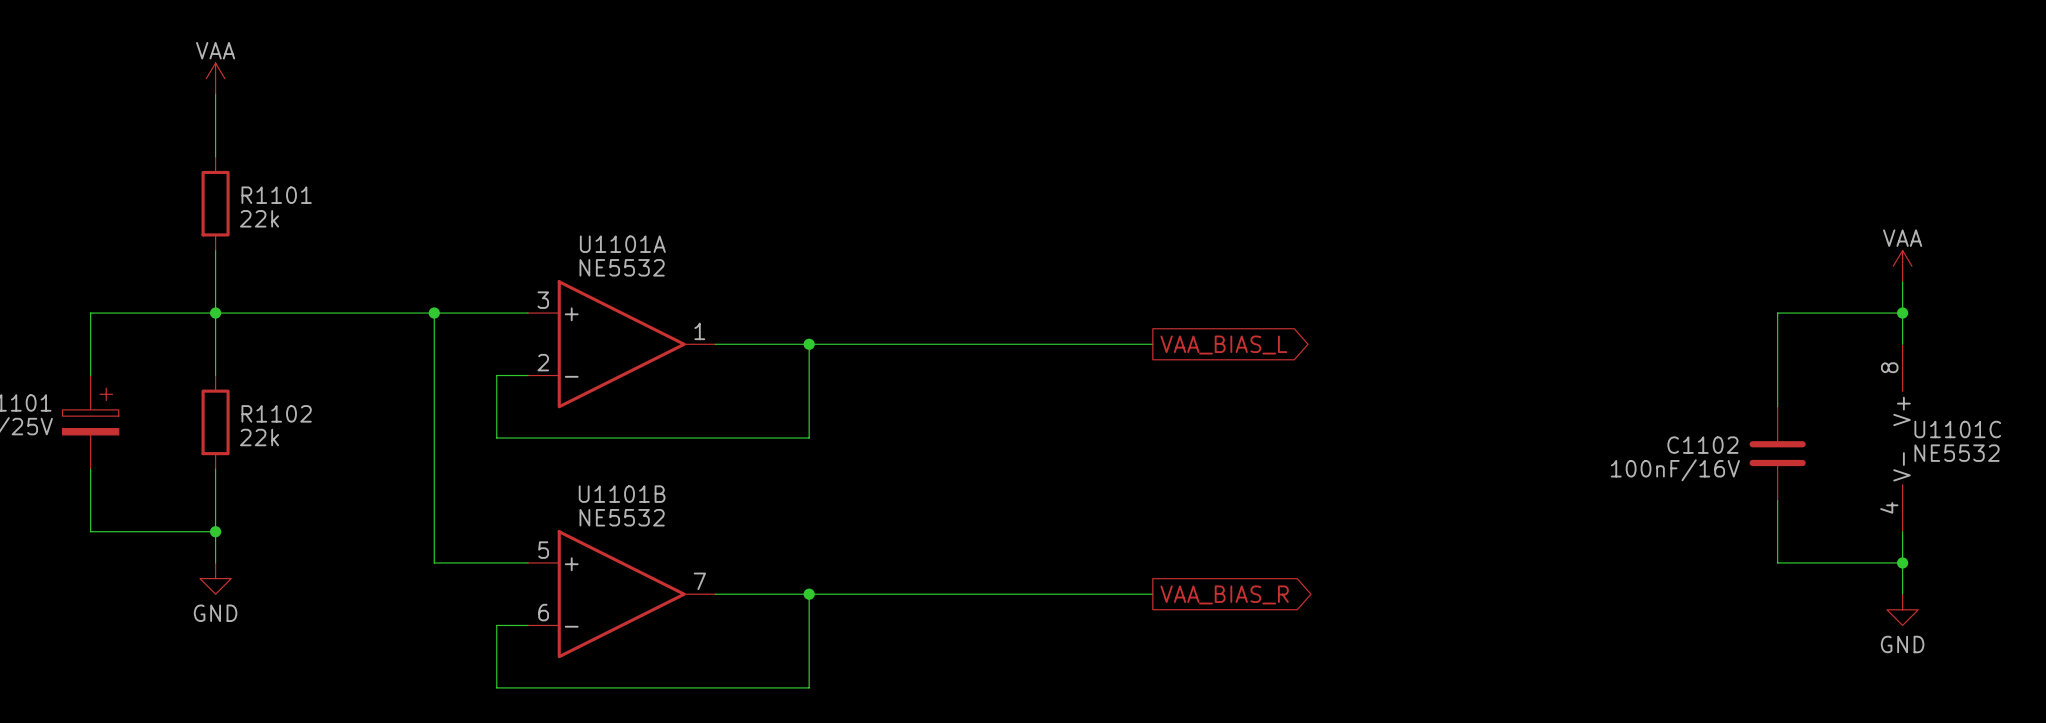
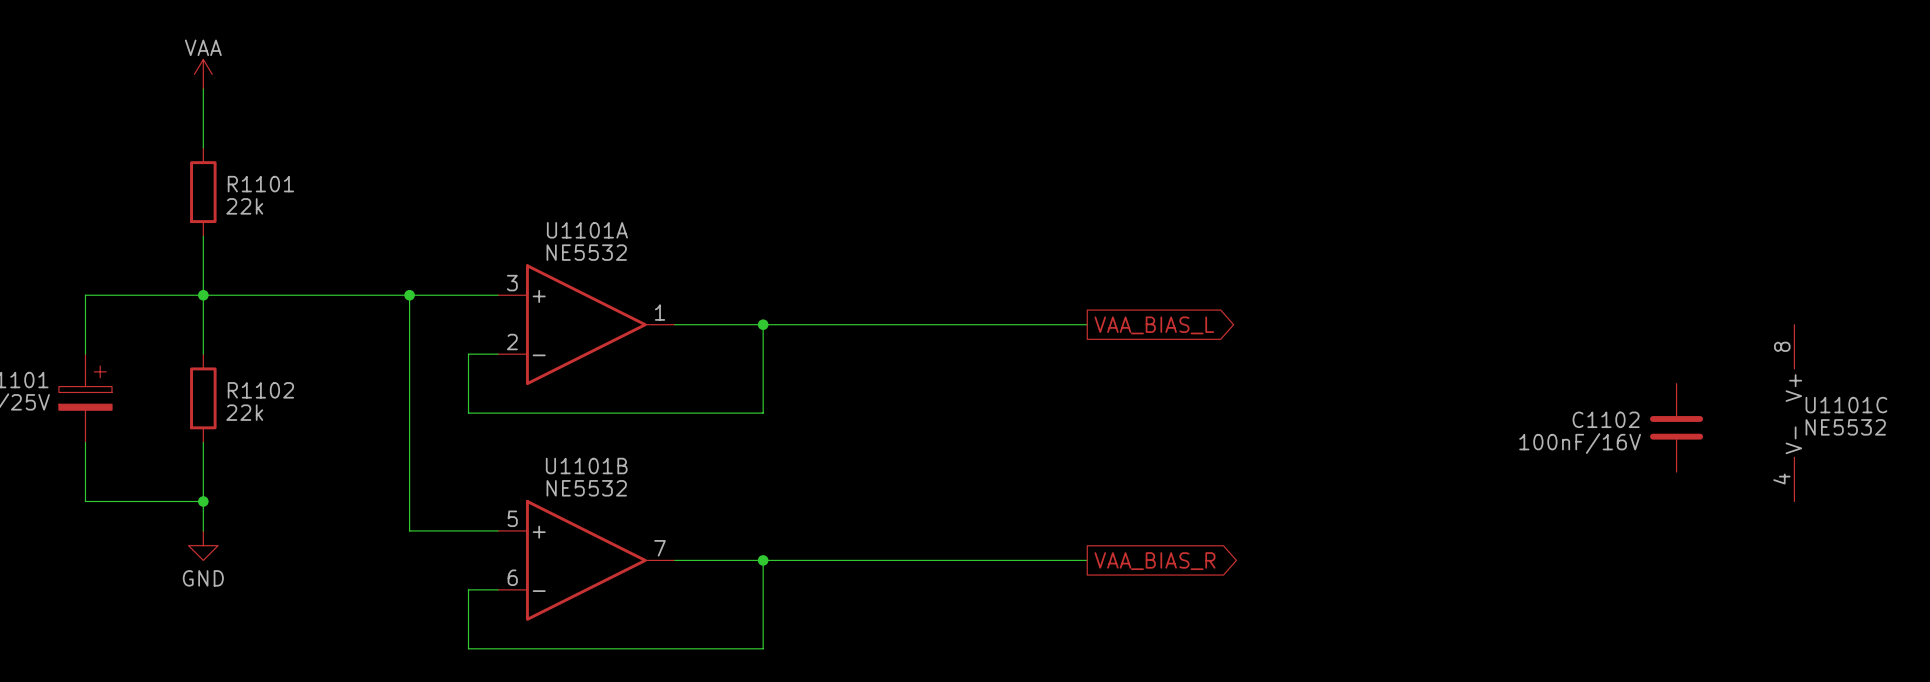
power symbol: VAA (1902, 266) -> none
wire: (1902, 281) (1902, 344) -> none
wire: (1902, 313) (1777, 313) (1777, 406) -> none
junction: (1902, 313) -> none
wire: (1777, 500) (1777, 562) (1902, 562) -> none
wire: (1902, 531) (1902, 594) -> none
junction: (1902, 562) -> none
power symbol: GND (1902, 609) -> none

